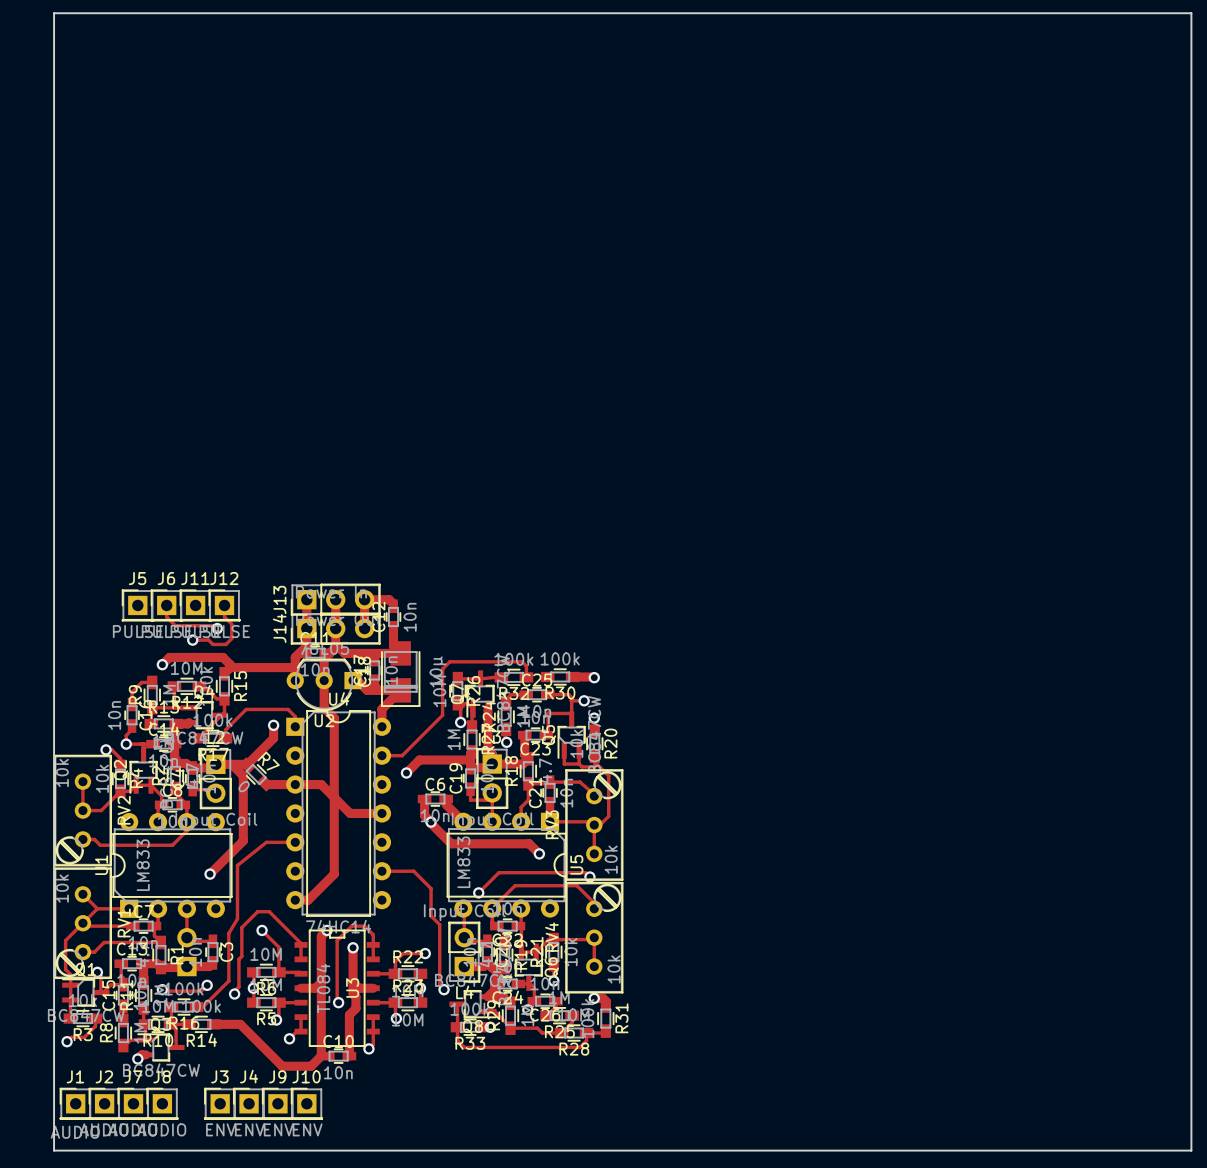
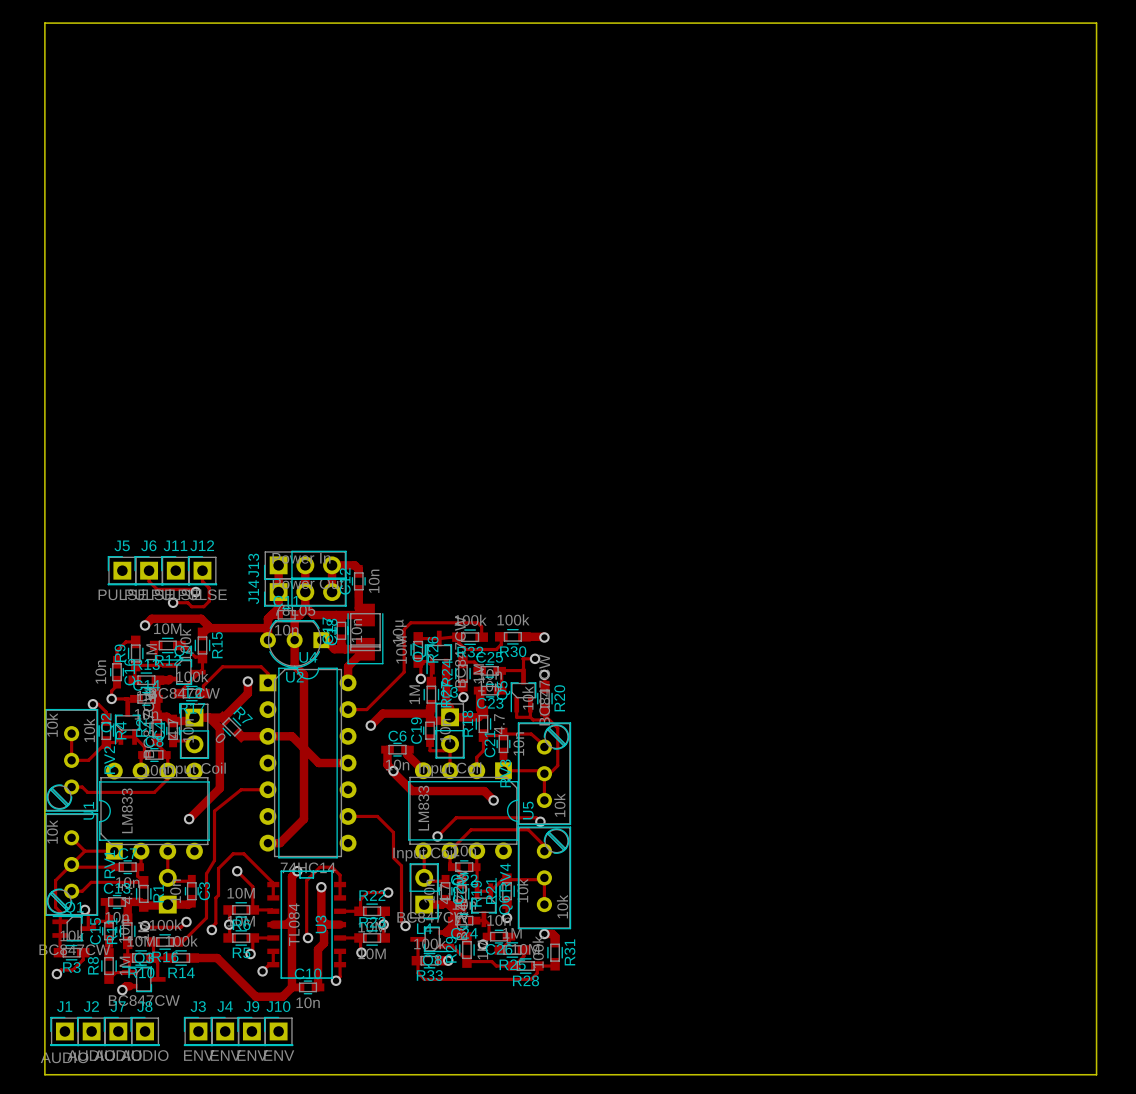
track: none -> (501, 636) (501, 644) (496, 649) (465, 649) (458, 642) (458, 637)
C25 position: (537, 694) -> (489, 670)
track: (547, 694) (568, 694) (571, 700) -> none
track: (526, 697) (526, 694) (511, 694) (506, 699) -> none
track: none -> (462, 662) (474, 662) (479, 667) (479, 673)

